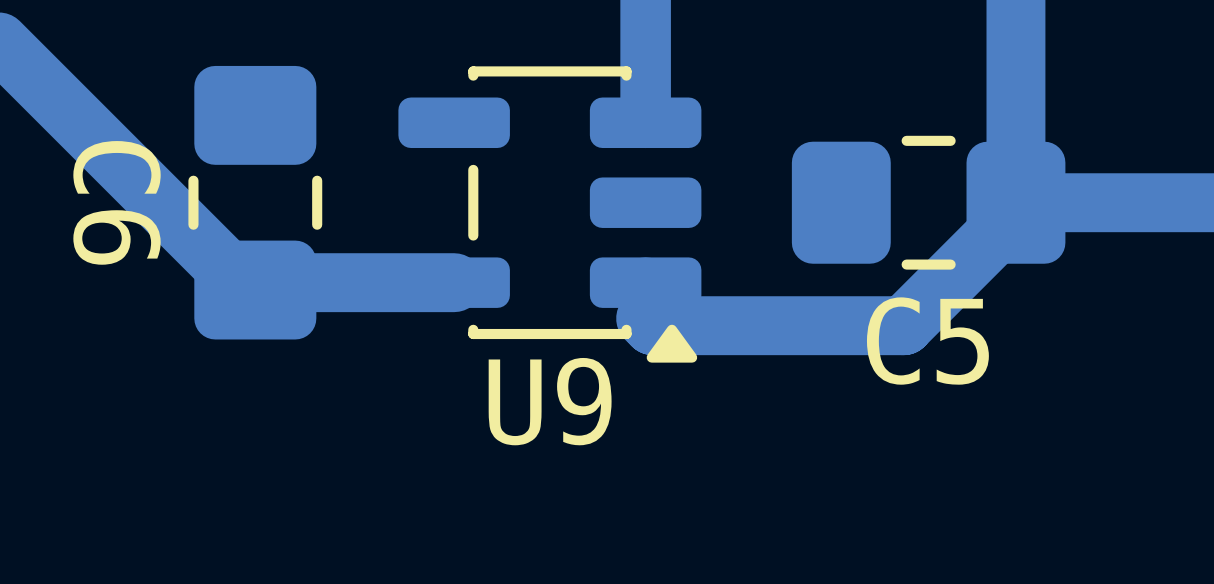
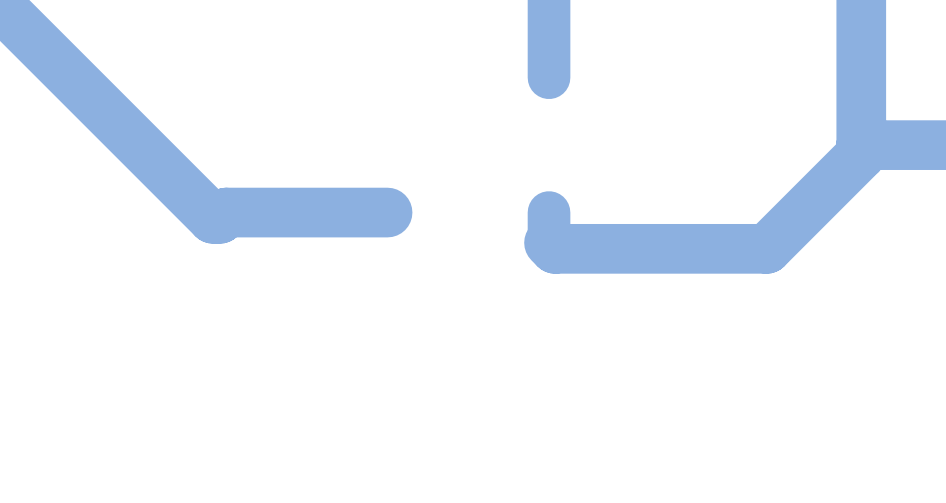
C6: (255, 202) -> none
C5: (928, 202) -> none
U9: (549, 214) -> none

